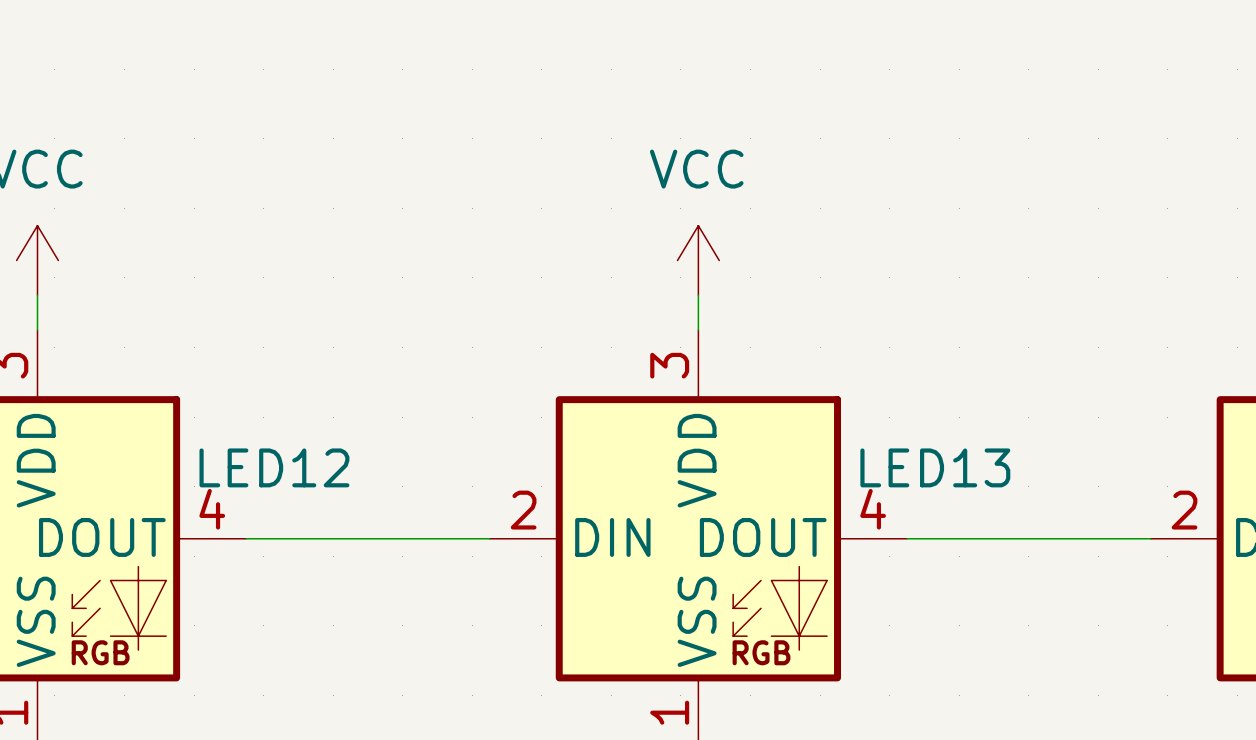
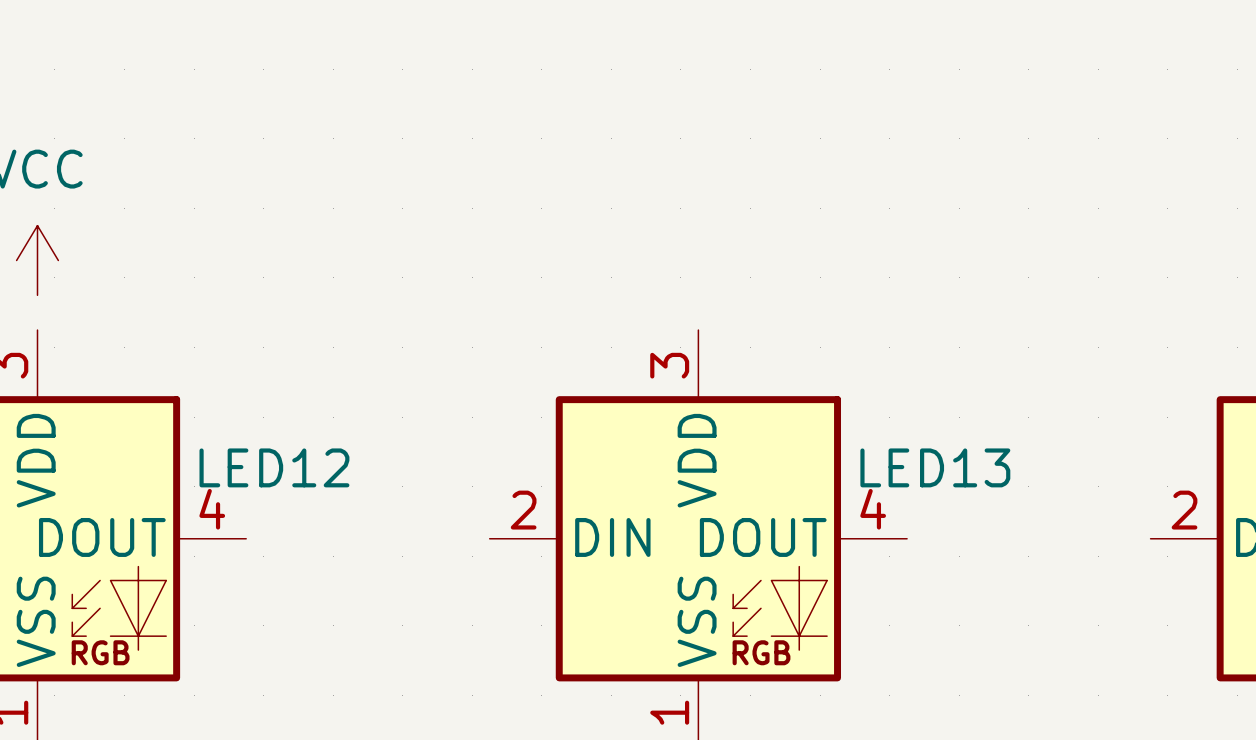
power symbol: VCC (698, 260) -> none
wire: (37, 295) (37, 330) -> none
wire: (698, 295) (698, 330) -> none
wire: (246, 538) (489, 538) -> none
wire: (907, 538) (1150, 538) -> none

